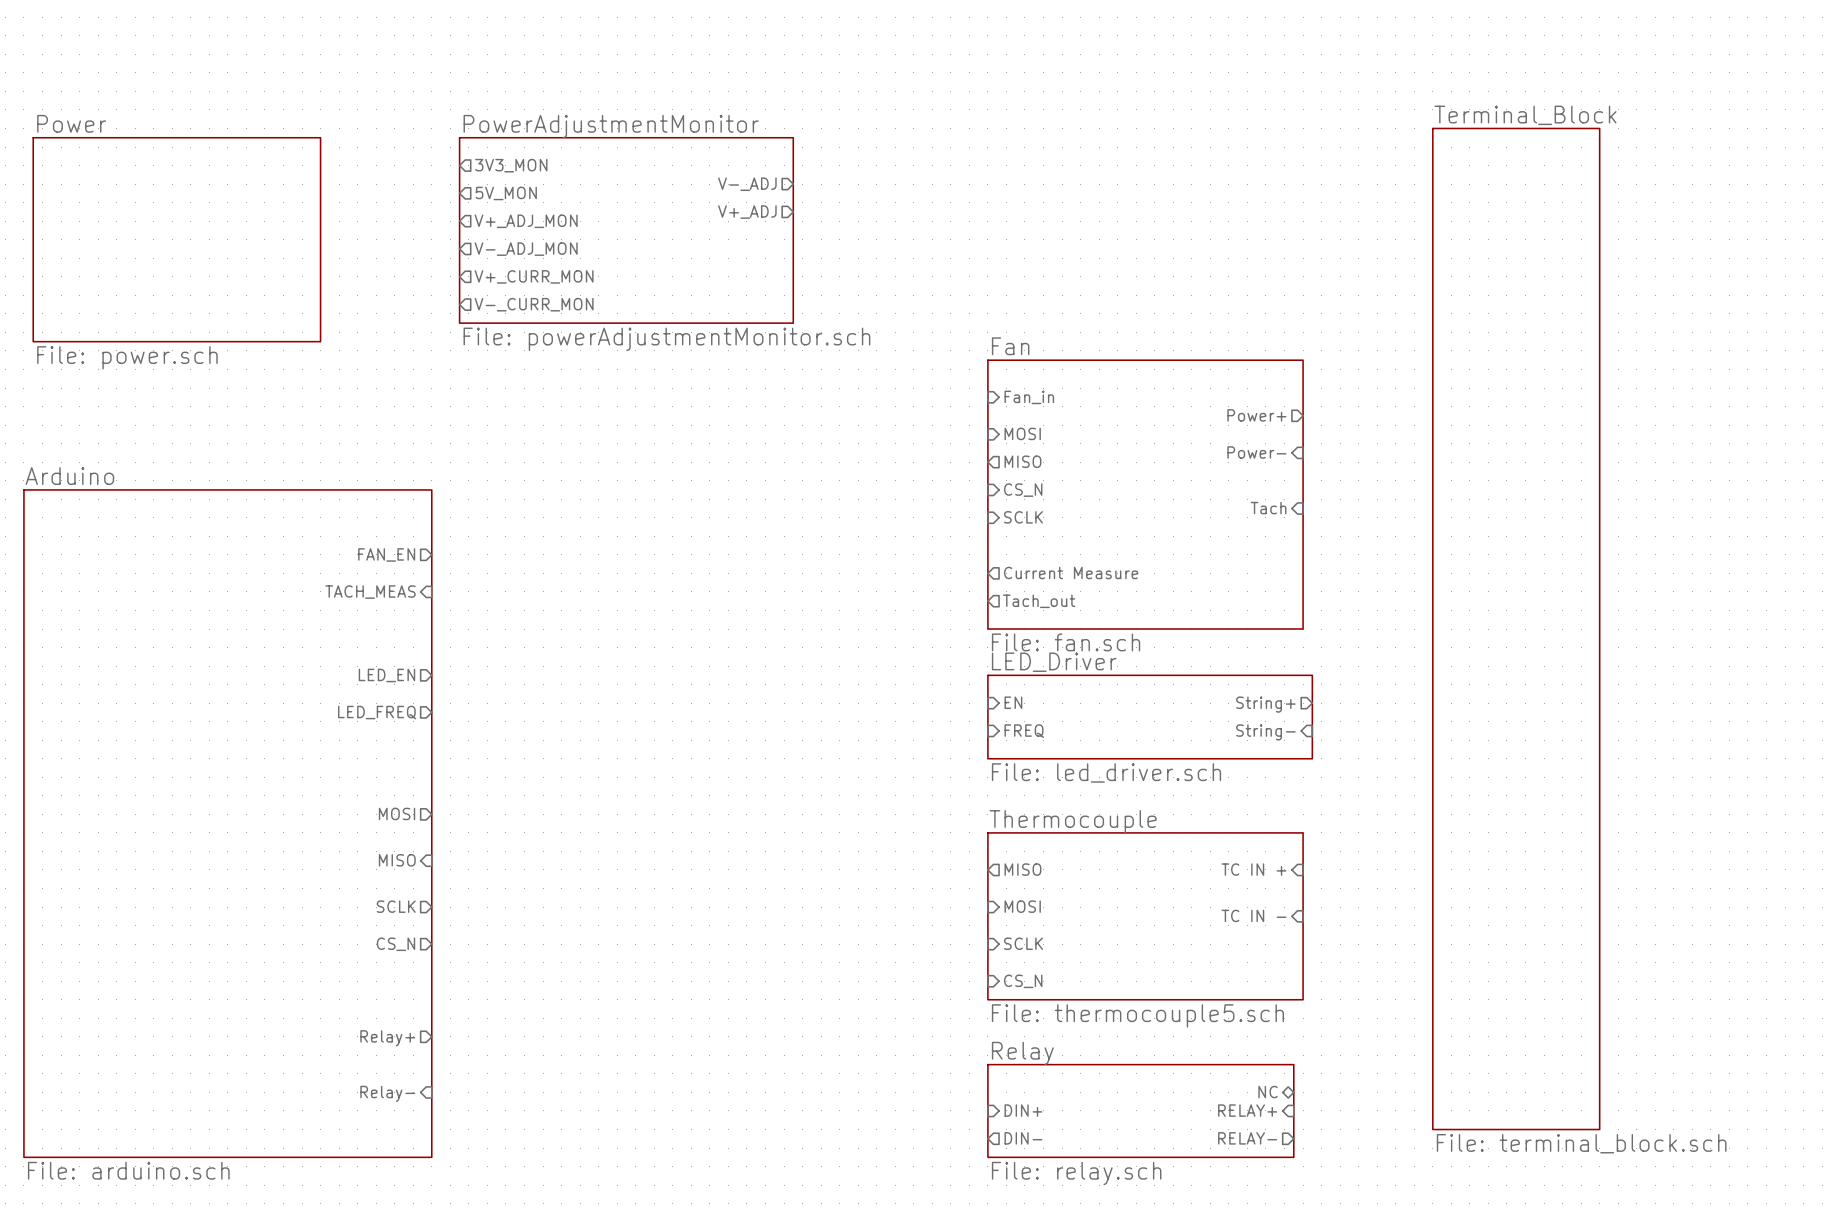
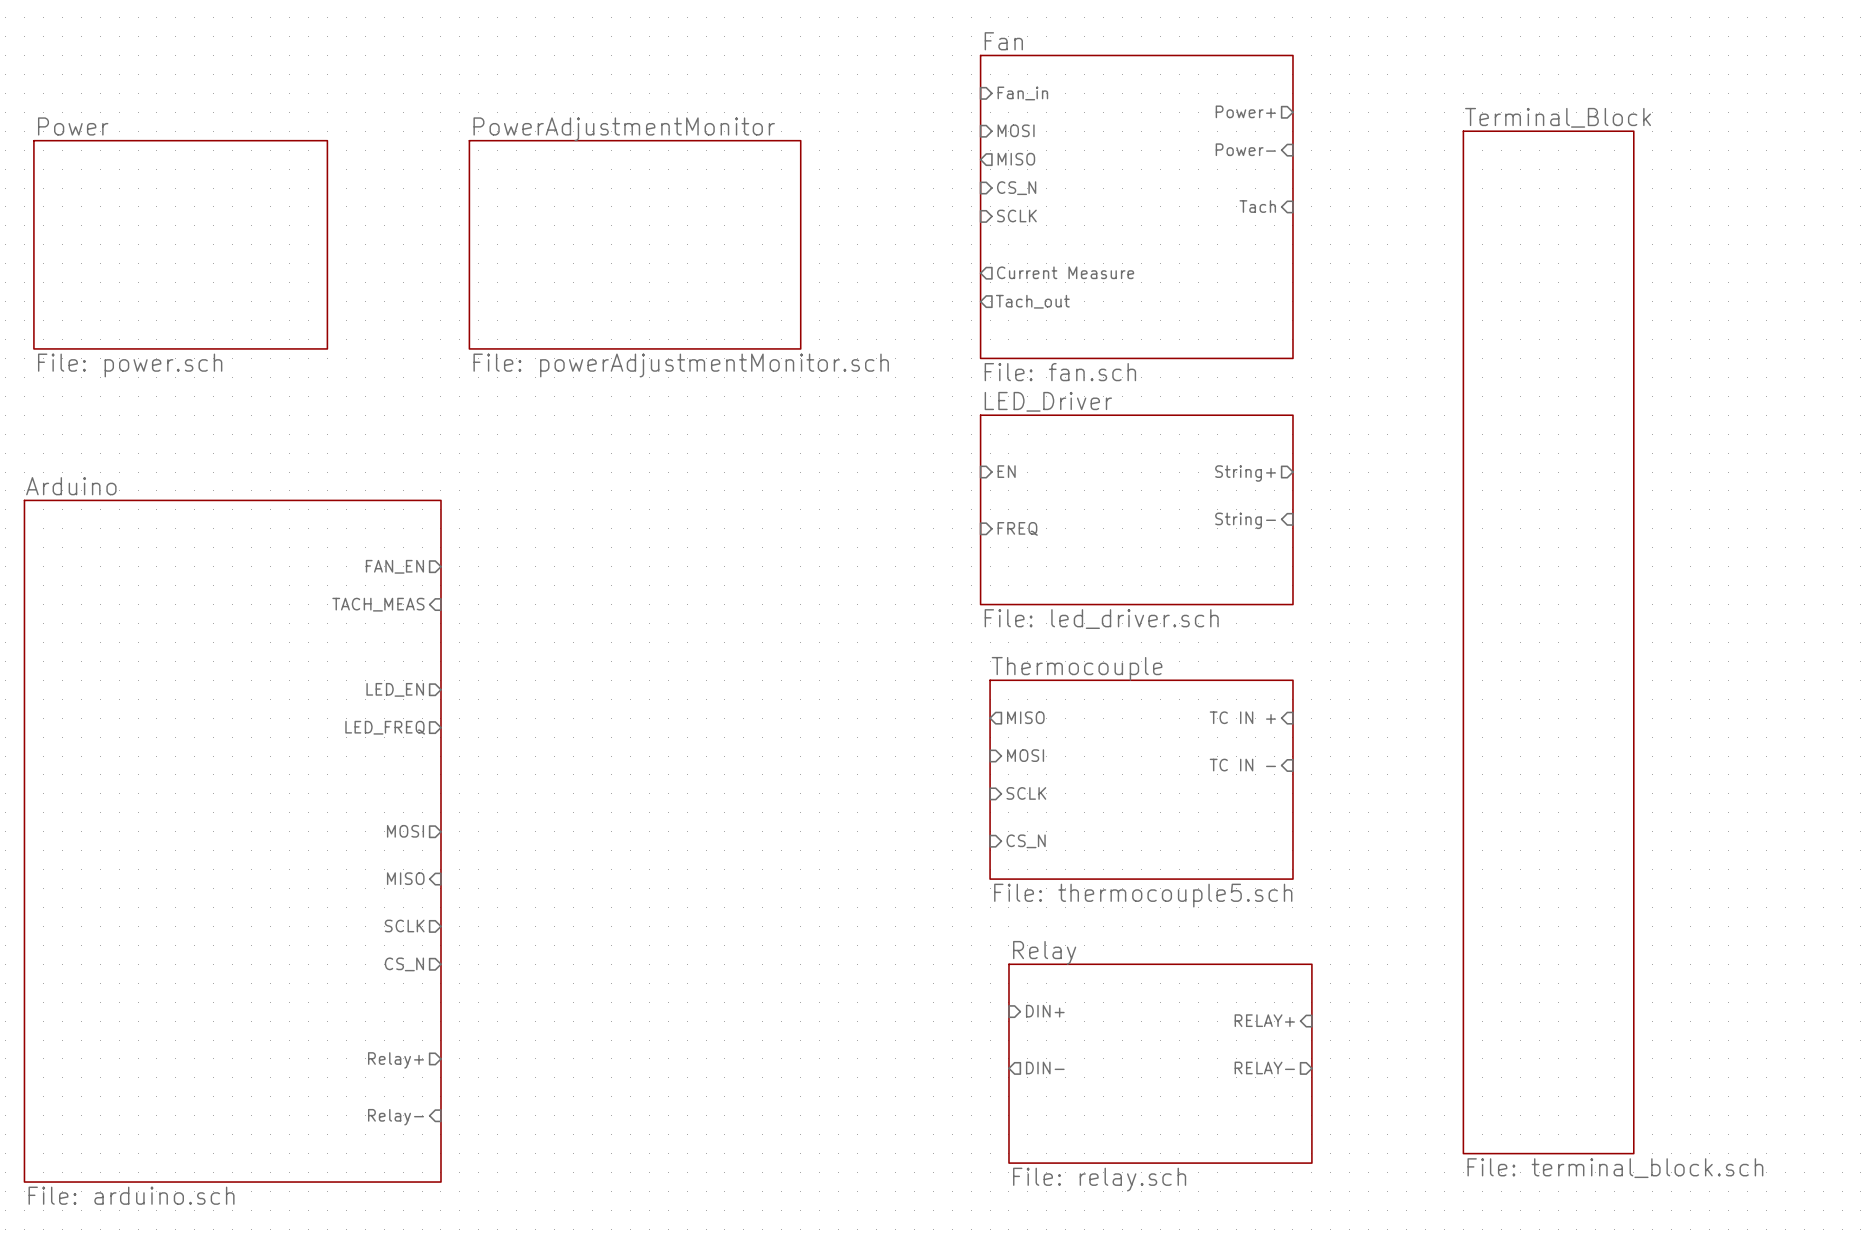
sheet pin: none -> Fan_in (1022, 93)
sheet pin: none -> Power+ (1245, 111)
sheet pin: none -> MOSI (1016, 130)
sheet pin: none -> Power- (1245, 149)
sheet pin: none -> MISO (1016, 159)
sheet pin: 3V3_MON (511, 165) -> none
sheet pin: V-_ADJ (747, 184) -> none
sheet pin: none -> CS_N (1016, 188)
sheet pin: 5V_MON (506, 193) -> none
sheet Fan: none -> File: fan.sch (1136, 206)
sheet pin: none -> Tach (1257, 206)
sheet pin: none -> SCLK (1016, 215)
sheet pin: V+_ADJ (747, 212) -> none
sheet pin: V+_ADJ_MON (526, 221) -> none
sheet PowerAdjustmentMonitor: File: powerAdjustmentMonitor.sch (626, 230) -> none
sheet PowerAdjustmentMonitor: none -> File: powerAdjustmentMonitor.sch (635, 244)
sheet pin: V-_ADJ_MON (526, 249) -> none
sheet pin: none -> Current Measure (1065, 272)
sheet pin: V+_CURR_MON (534, 276) -> none
sheet pin: none -> Tach_out (1032, 301)
sheet pin: V-_CURR_MON (534, 304) -> none
sheet pin: Fan_in (1029, 397) -> none
sheet pin: Power+ (1256, 415) -> none
sheet pin: MOSI (1022, 433) -> none
sheet pin: Power- (1256, 452) -> none
sheet pin: none -> EN (1006, 471)
sheet pin: MISO (1022, 461) -> none
sheet pin: none -> String+ (1245, 473)
sheet pin: CS_N (1023, 490) -> none
sheet Fan: File: fan.sch (1145, 494) -> none
sheet LED_Driver: none -> File: led_driver.sch (1136, 509)
sheet pin: Tach (1268, 508) -> none
sheet pin: none -> String- (1245, 520)
sheet pin: none -> FREQ (1017, 528)
sheet pin: SCLK (1023, 517) -> none
sheet pin: Current Measure (1071, 572) -> none
sheet pin: Tach_out (1039, 601) -> none
sheet pin: none -> MISO (1025, 717)
sheet pin: EN (1013, 702) -> none
sheet pin: String+ (1265, 704) -> none
sheet LED_Driver: File: led_driver.sch (1150, 717) -> none
sheet pin: FREQ (1024, 731) -> none
sheet pin: String- (1265, 732) -> none
sheet pin: none -> MOSI (1025, 755)
sheet Thermocouple: none -> File: thermocouple5.sch (1141, 779)
sheet pin: none -> SCLK (1026, 793)
sheet pin: MISO (1022, 869) -> none
sheet pin position: TC IN + (1254, 869) -> TC IN + (1242, 717)
sheet pin: MOSI (1022, 906) -> none
sheet pin position: TC IN - (1254, 915) -> TC IN - (1242, 765)
sheet Thermocouple: File: thermocouple5.sch (1145, 916) -> none
sheet pin: SCLK (1023, 943) -> none
sheet pin position: CS_N (1023, 981) -> CS_N (1026, 841)
sheet Relay: none -> File: relay.sch (1160, 1063)
sheet pin: NC (1268, 1092) -> none
sheet pin position: DIN+ (1023, 1110) -> DIN+ (1045, 1011)
sheet Relay: File: relay.sch (1140, 1110) -> none
sheet pin position: RELAY+ (1247, 1110) -> RELAY+ (1264, 1020)
sheet pin position: DIN- (1023, 1138) -> DIN- (1045, 1067)
sheet pin position: RELAY- (1247, 1138) -> RELAY- (1264, 1067)

